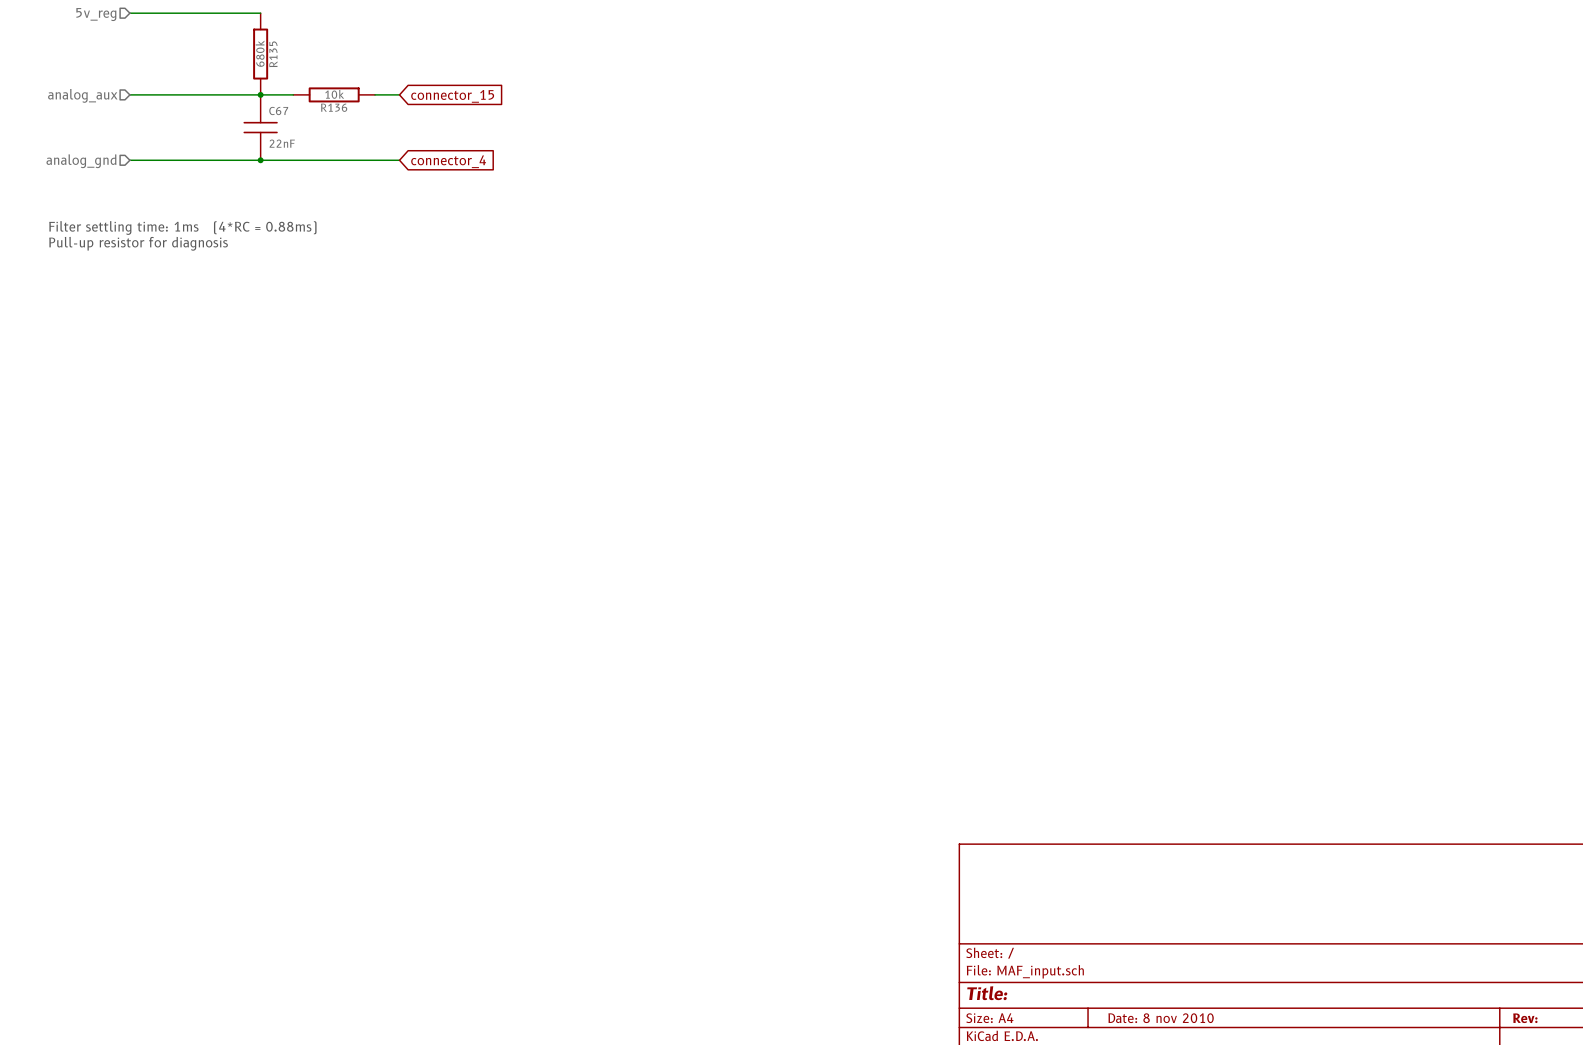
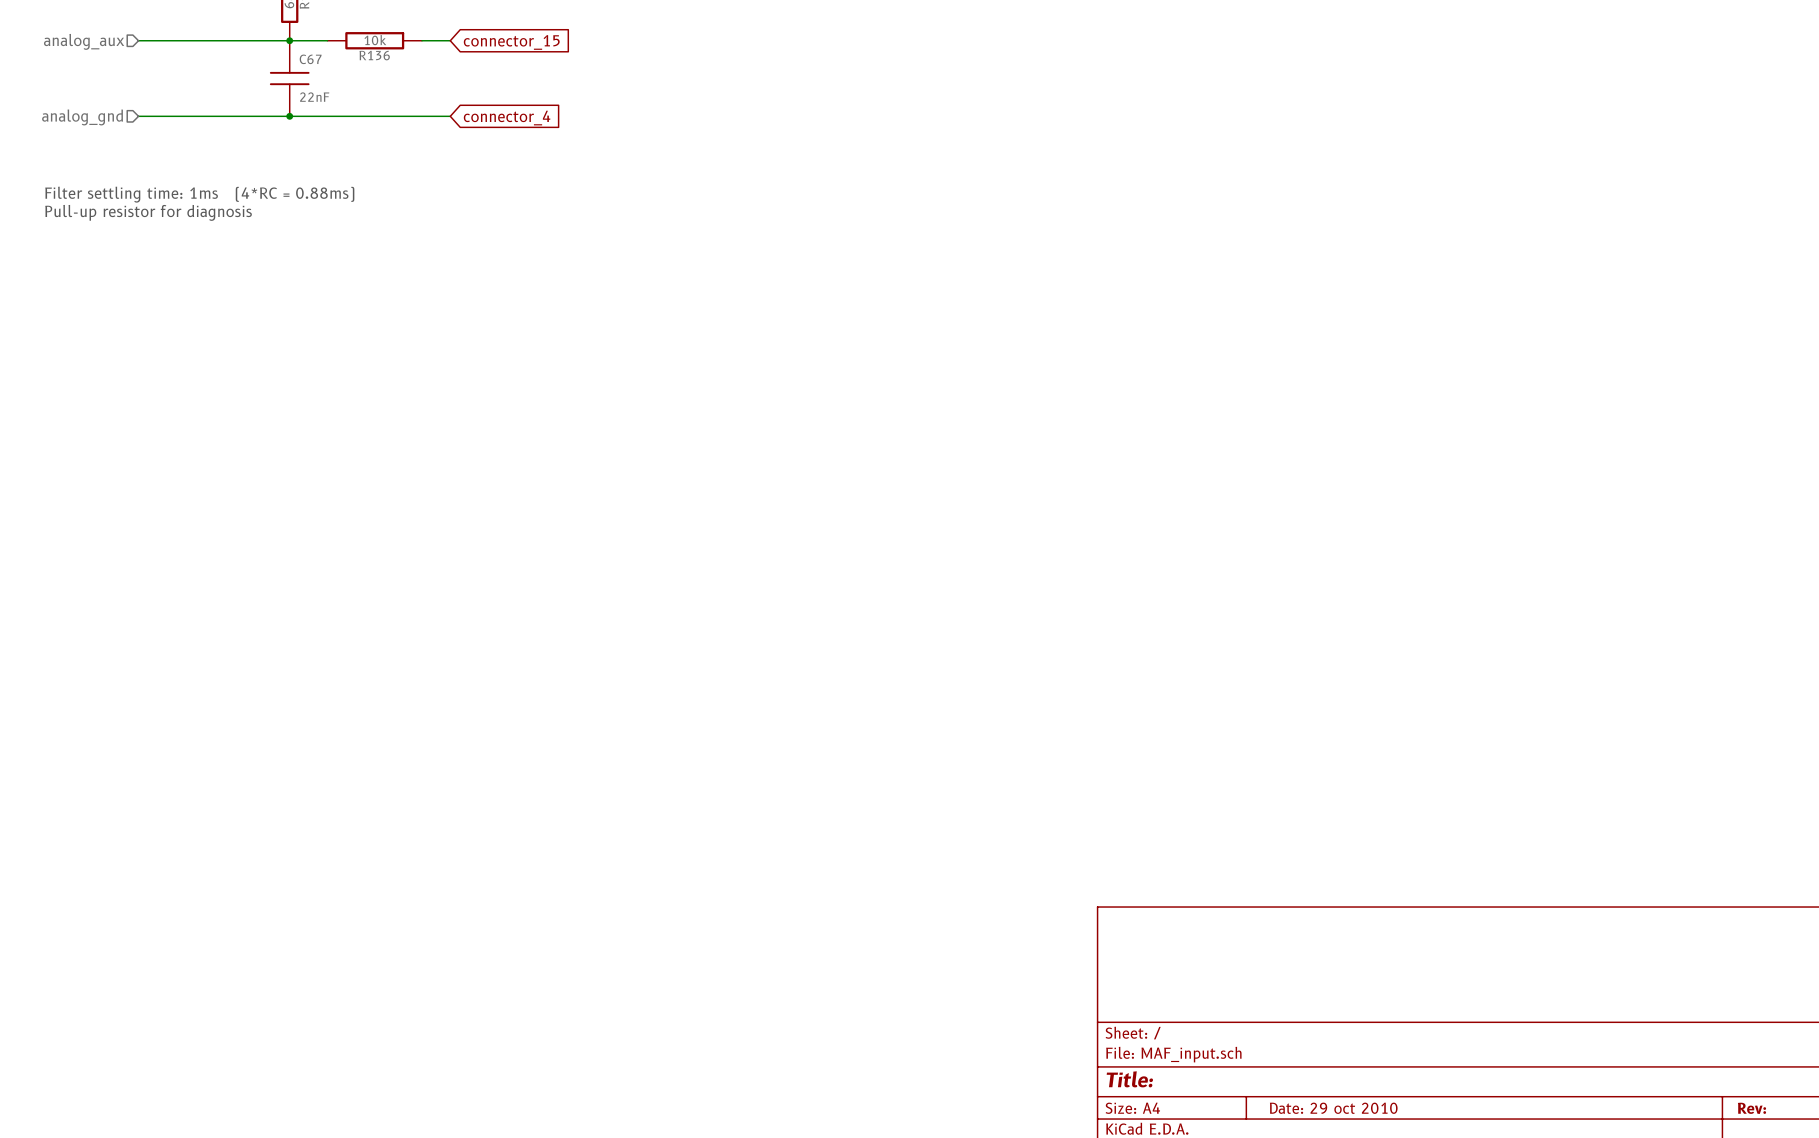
title block: Date: 8 nov 2010 (1161, 1018) -> Date: 29 oct 2010 (1333, 1108)

